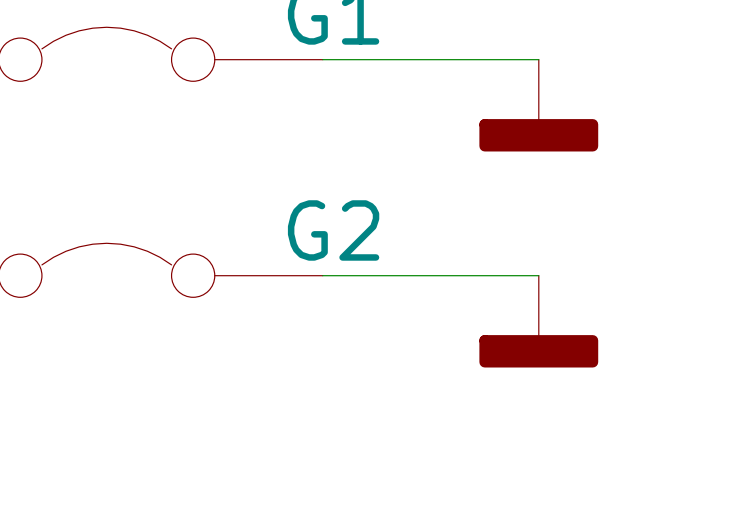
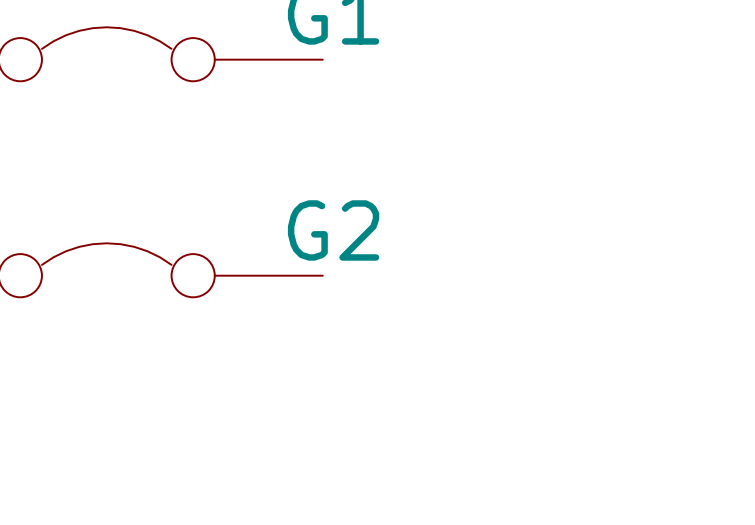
wire: (322, 59) (538, 59) -> none
power symbol: (538, 105) -> none
wire: (322, 275) (538, 275) -> none
power symbol: (538, 321) -> none

